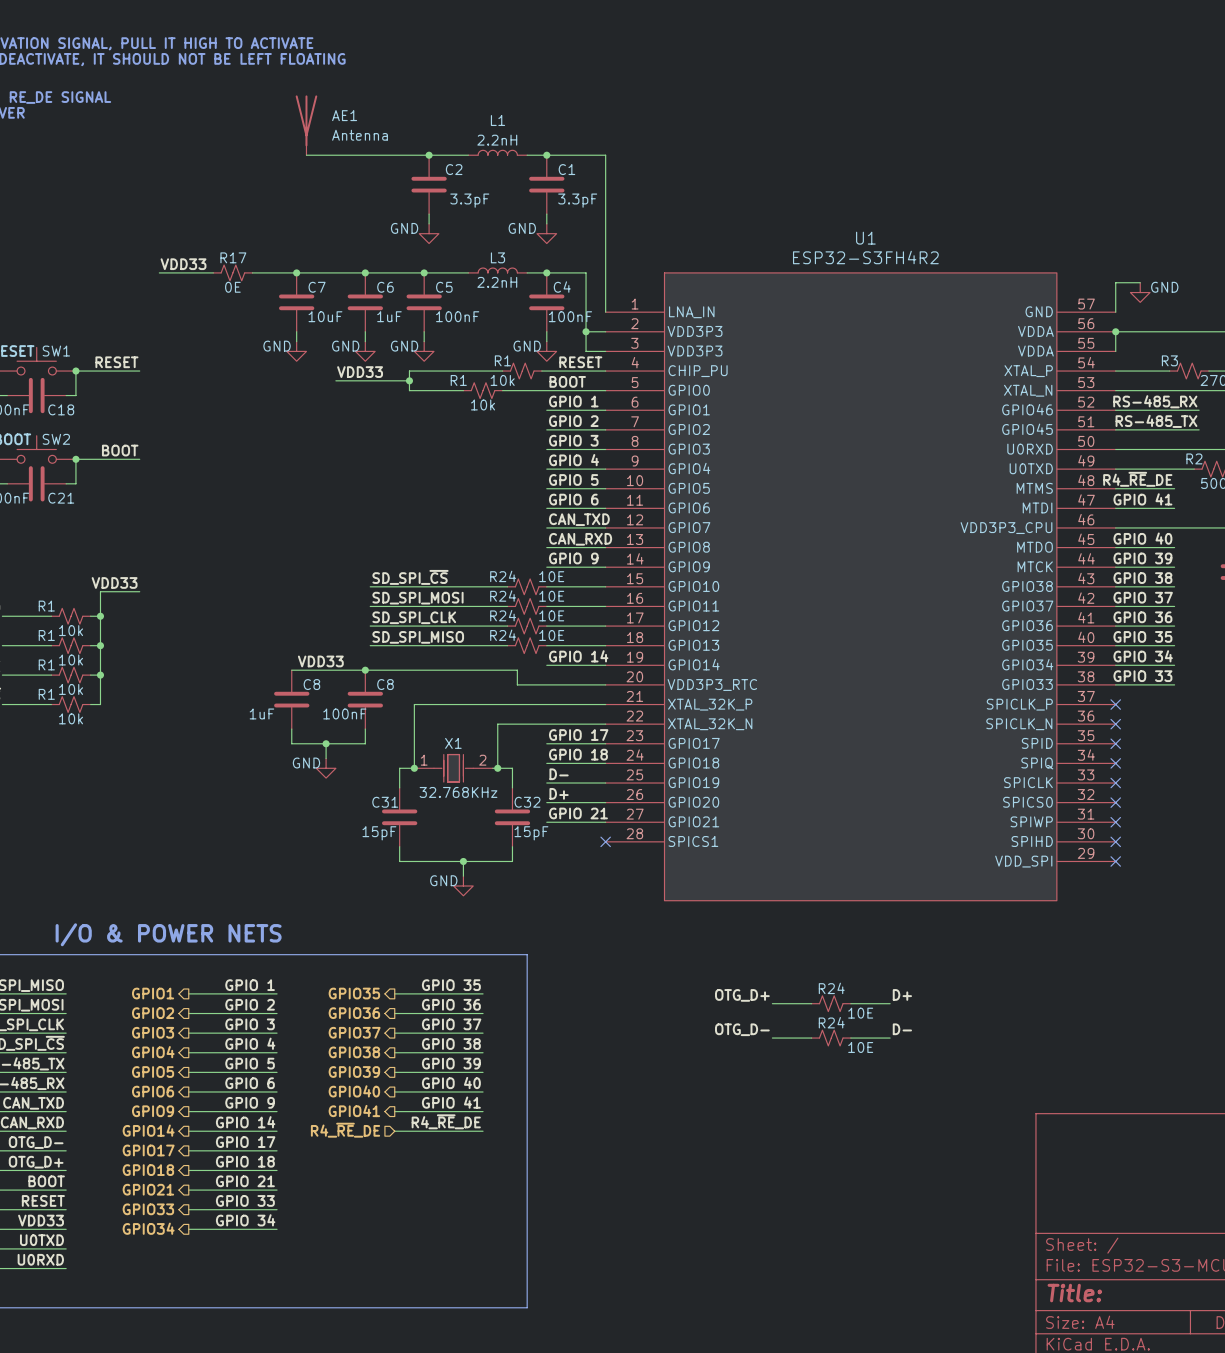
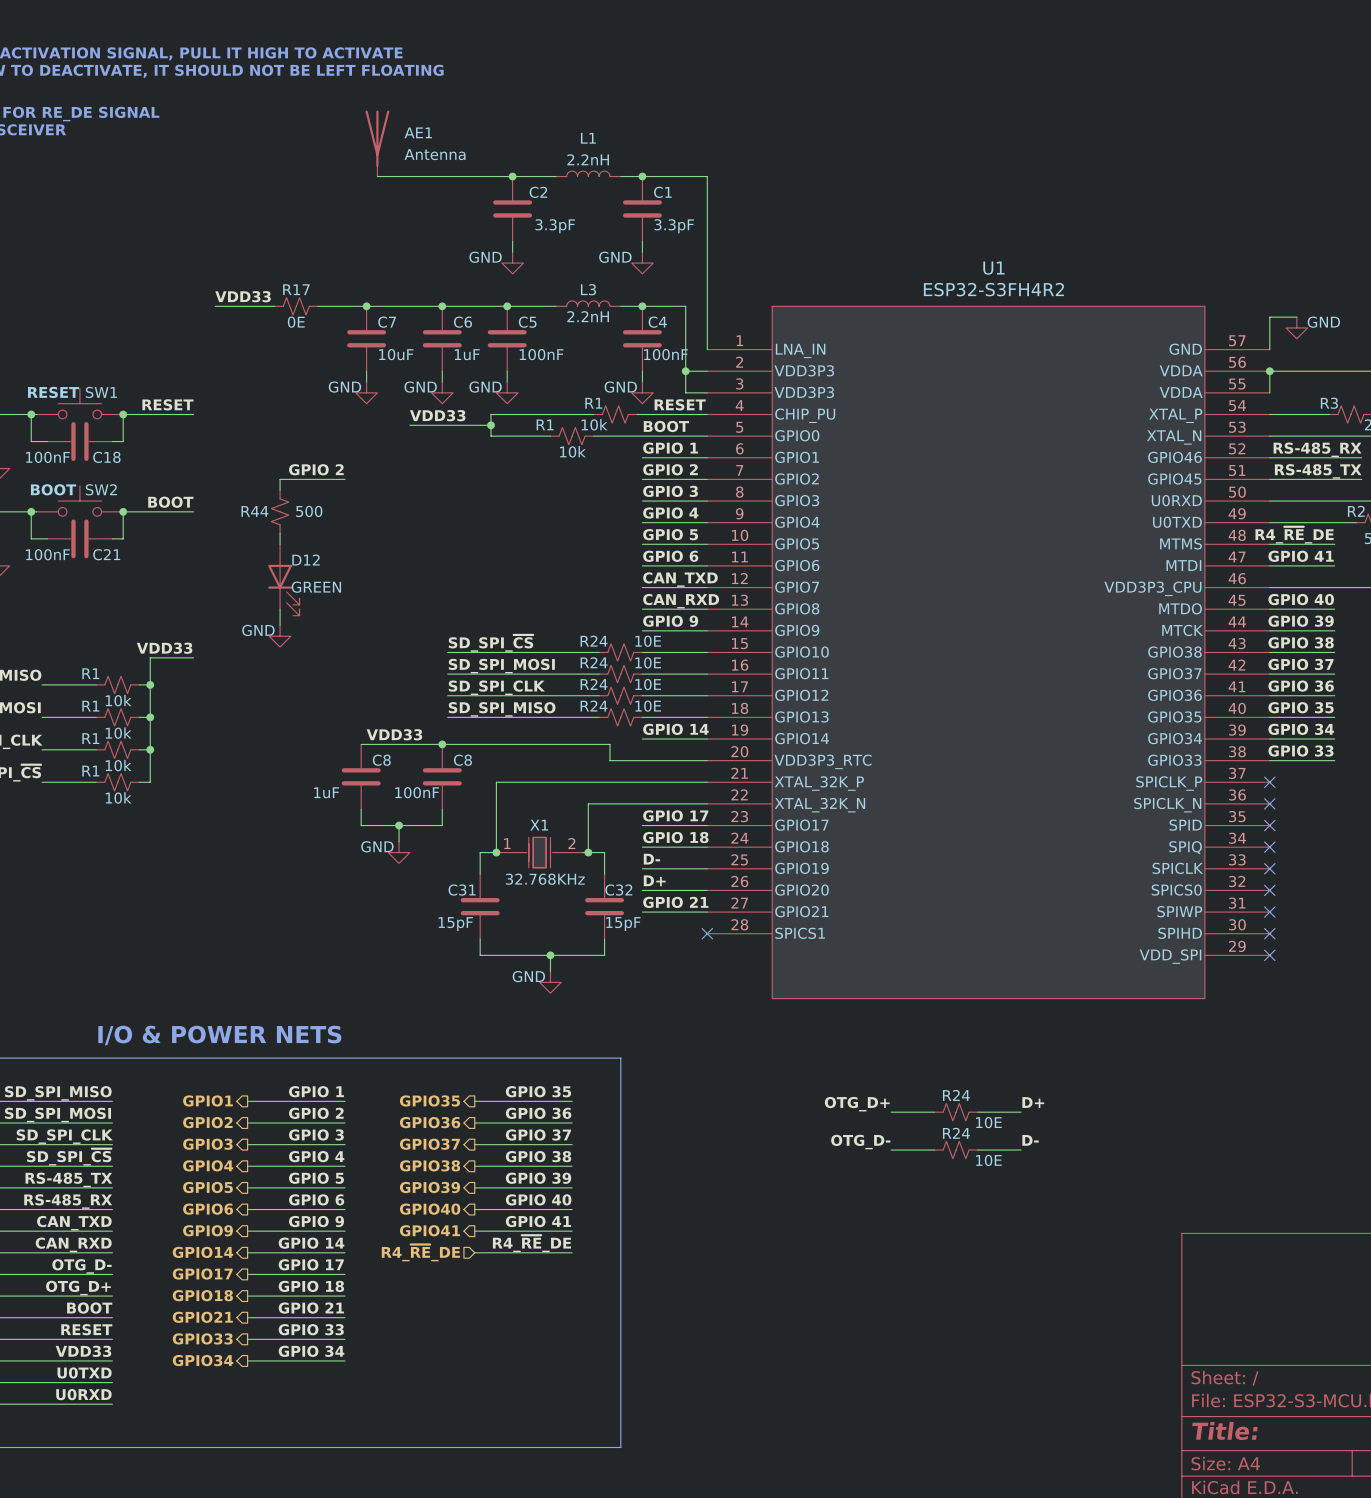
label: none -> GPIO 2 (316, 469)
wire: none -> (344, 479) (280, 479) (280, 490)
R44: none -> 500 (280, 511)
wire: none -> (280, 533) (280, 544)
D12: none -> GREEN (283, 579)
wire: none -> (280, 609) (280, 625)
power symbol: none -> GND (280, 636)

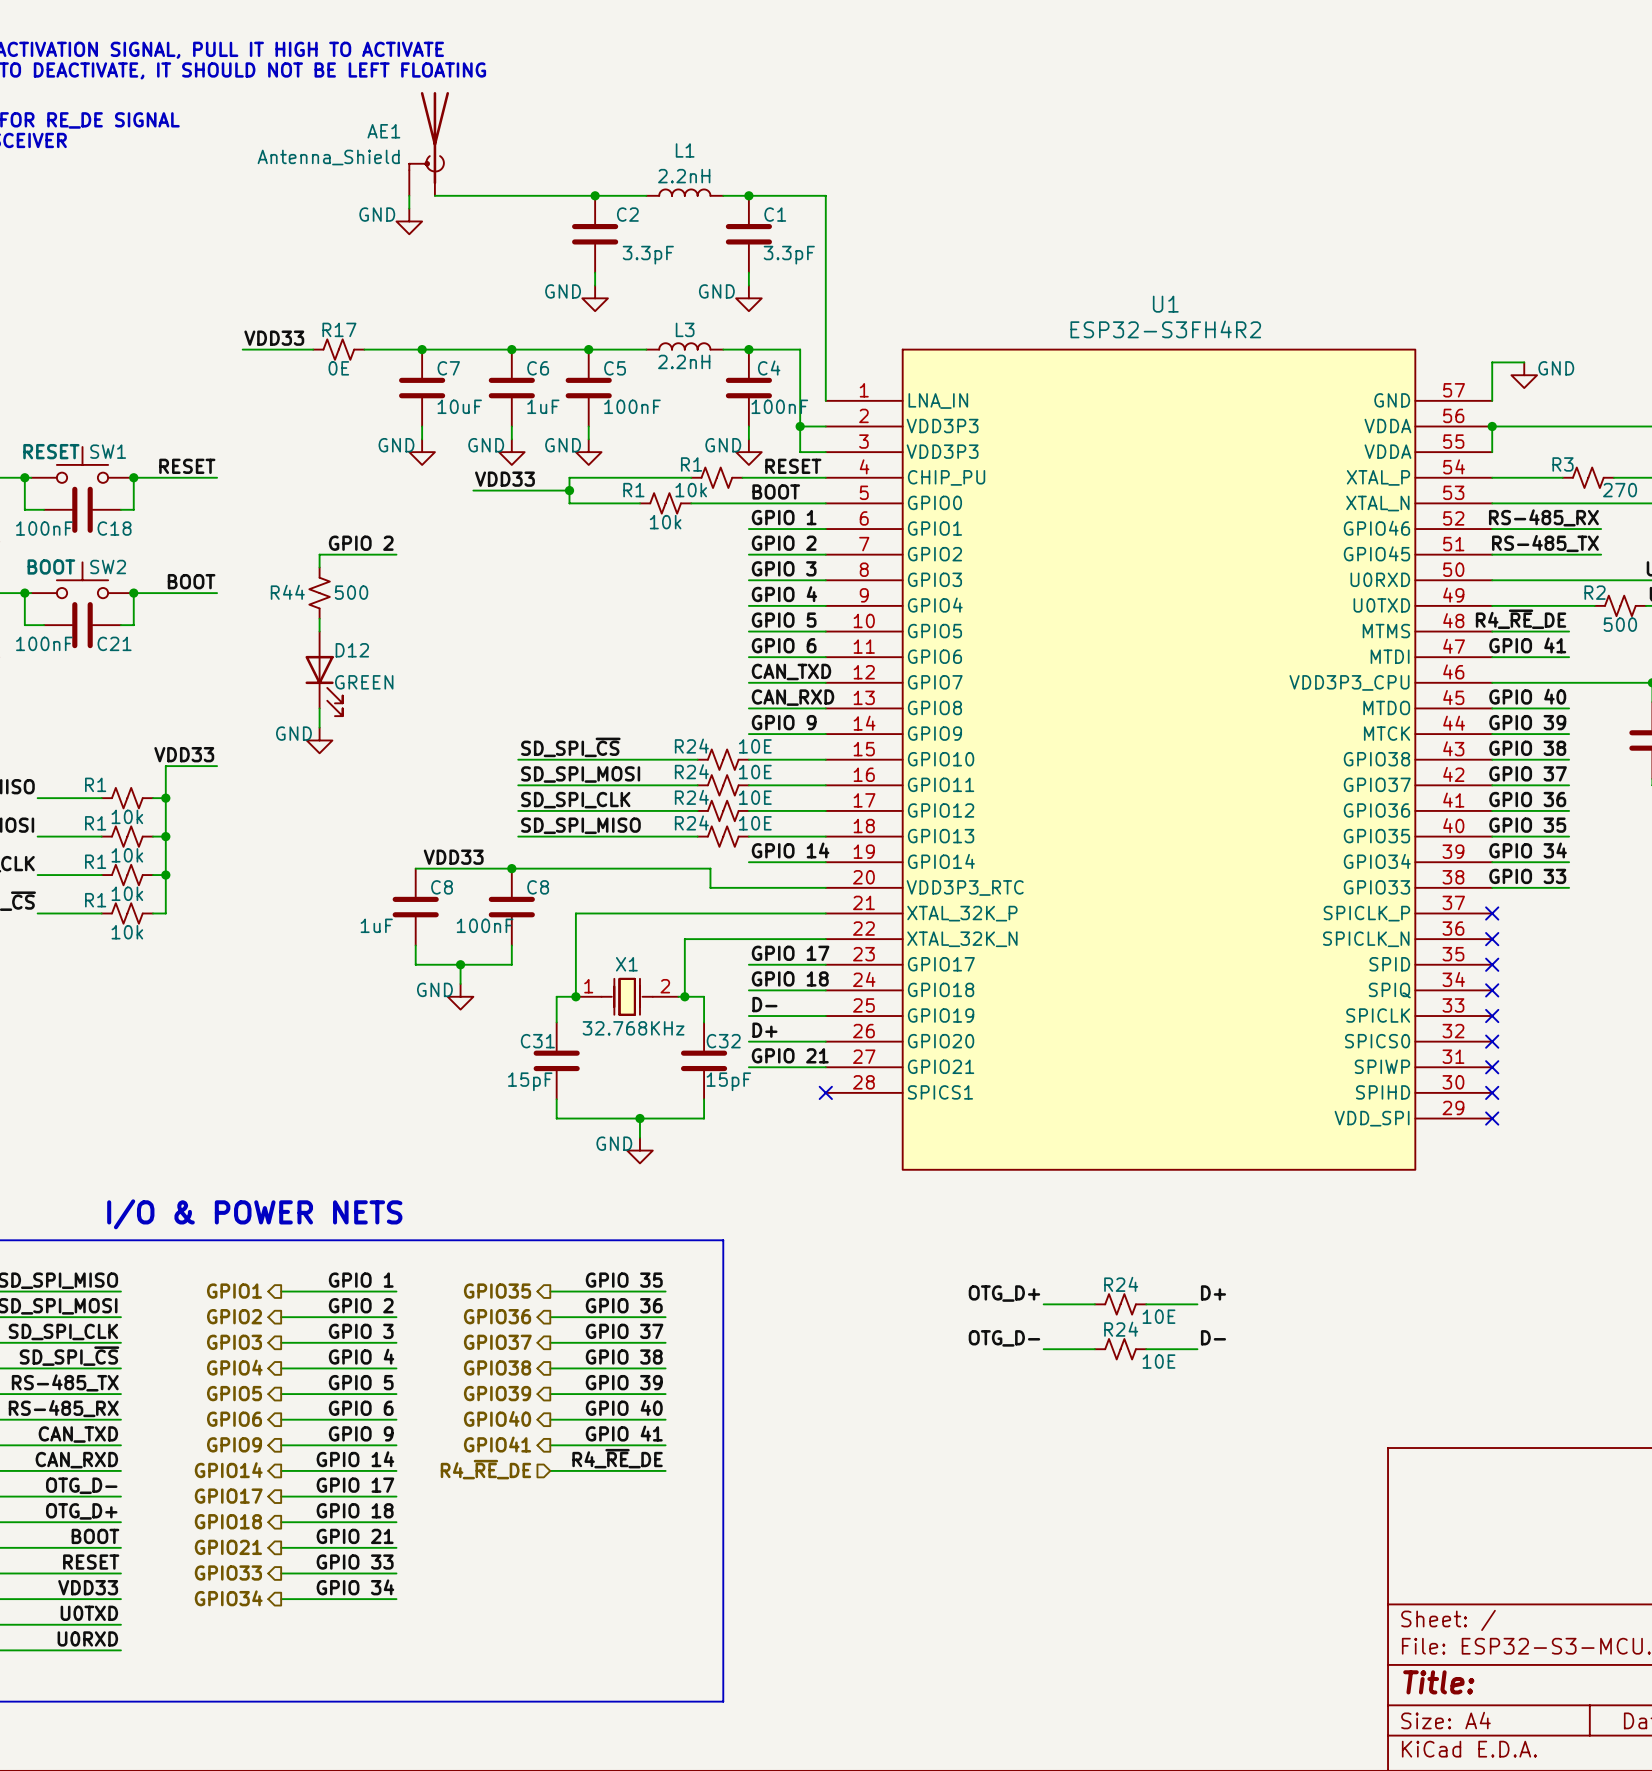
AE1 symbol: [365, 110, 390, 177] -> [409, 92, 450, 196]
AE1 name position: AE1 (418, 132) -> AE1 (383, 131)
AE1 value: Antenna (435, 154) -> Antenna_Shield (328, 157)
wire: none -> (409, 195) (409, 208)
power symbol: none -> GND (409, 221)

